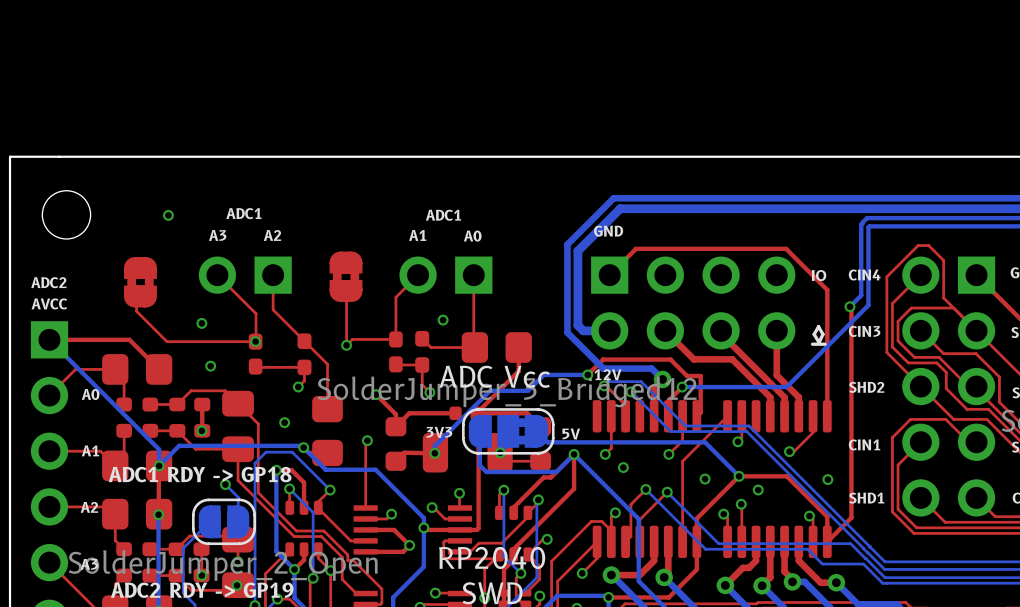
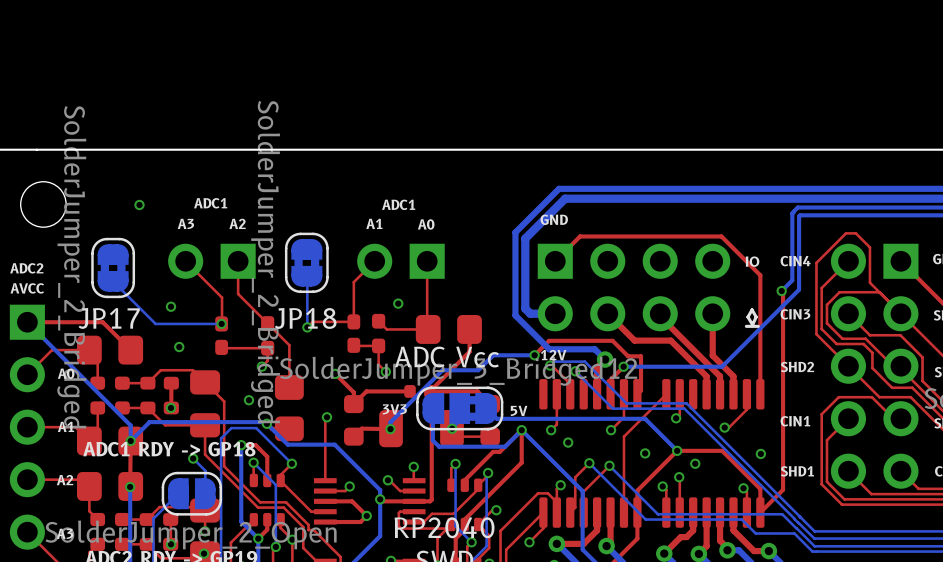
JP18 side: top (346, 276) -> bottom (306, 262)
JP17 side: top (140, 282) -> bottom (113, 267)
bottom track: none -> (306, 276) (307, 327)
top track: (346, 291) (346, 345) -> none
top track: (137, 296) (136, 311) (166, 341) (255, 341) -> none
bottom track: none -> (113, 281) (155, 323) (221, 323)

